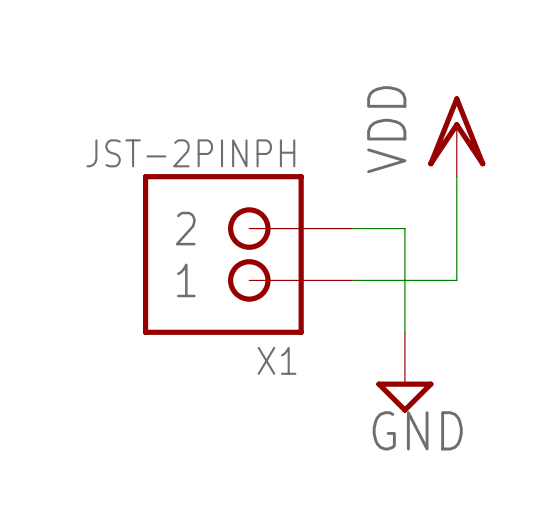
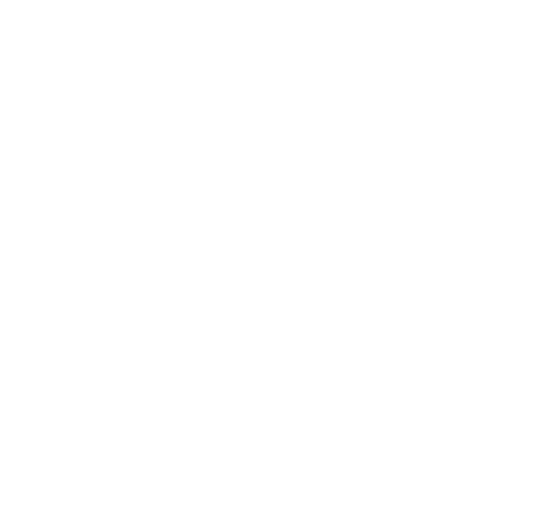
power symbol: VDD (456, 136) -> none
wire: (456, 176) (456, 280) (353, 280) -> none
wire: (353, 228) (404, 228) (404, 332) -> none
X1: JST-2PINPH (248, 254) -> none
power symbol: GND (404, 372) -> none

